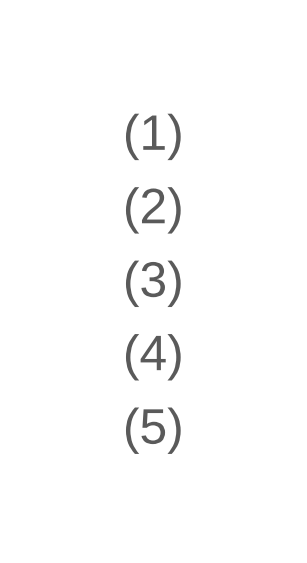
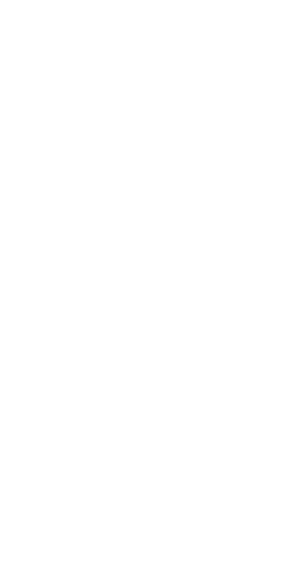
text: (1) (153, 136) -> none
text: (2) (153, 210) -> none
text: (3) (153, 283) -> none
text: (4) (153, 357) -> none
text: (5) (153, 430) -> none

